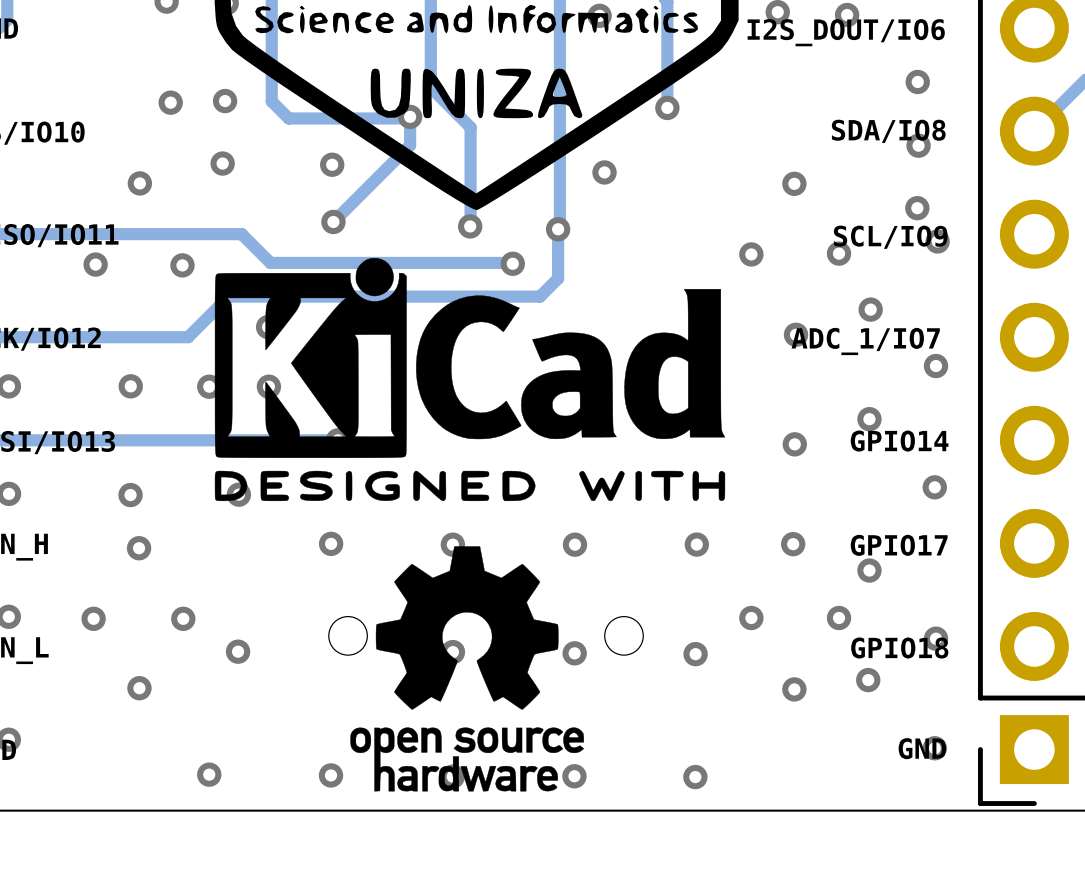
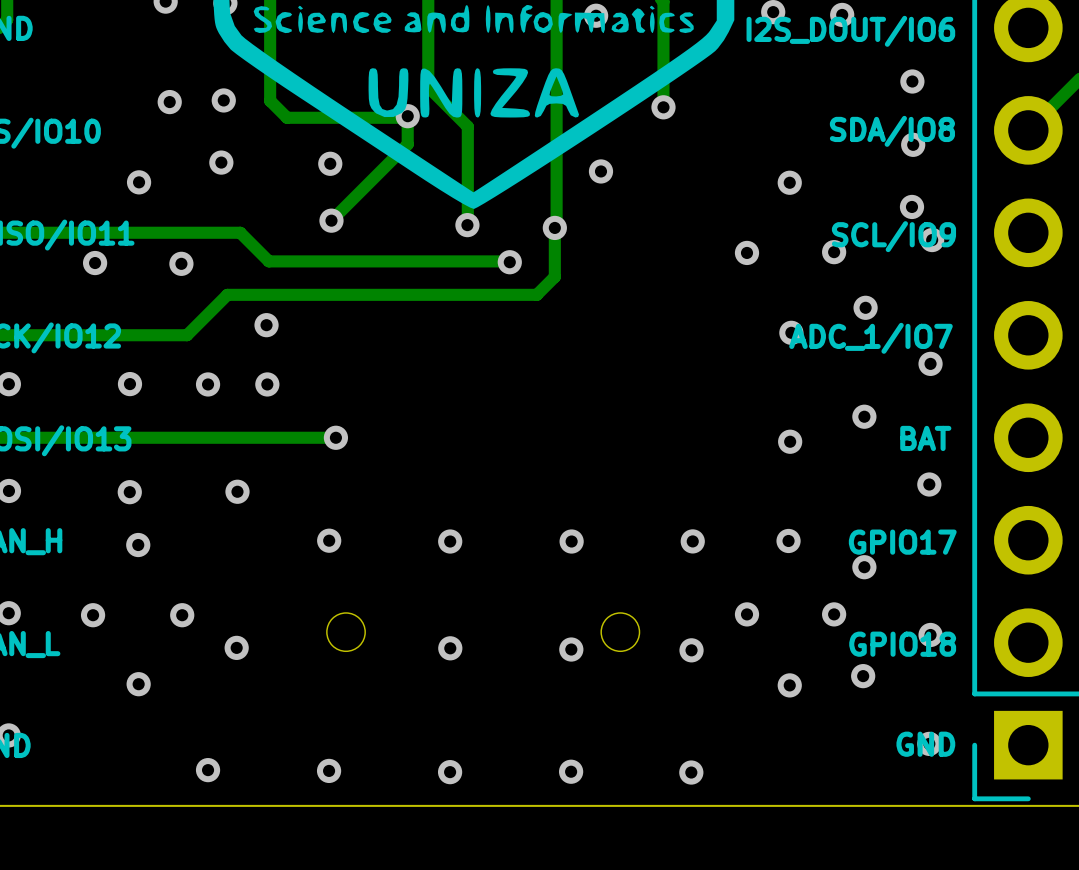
drawing: [214, 257, 726, 792] -> none
text: GPIO14 (899, 441) -> none
text: none -> BAT (925, 438)

